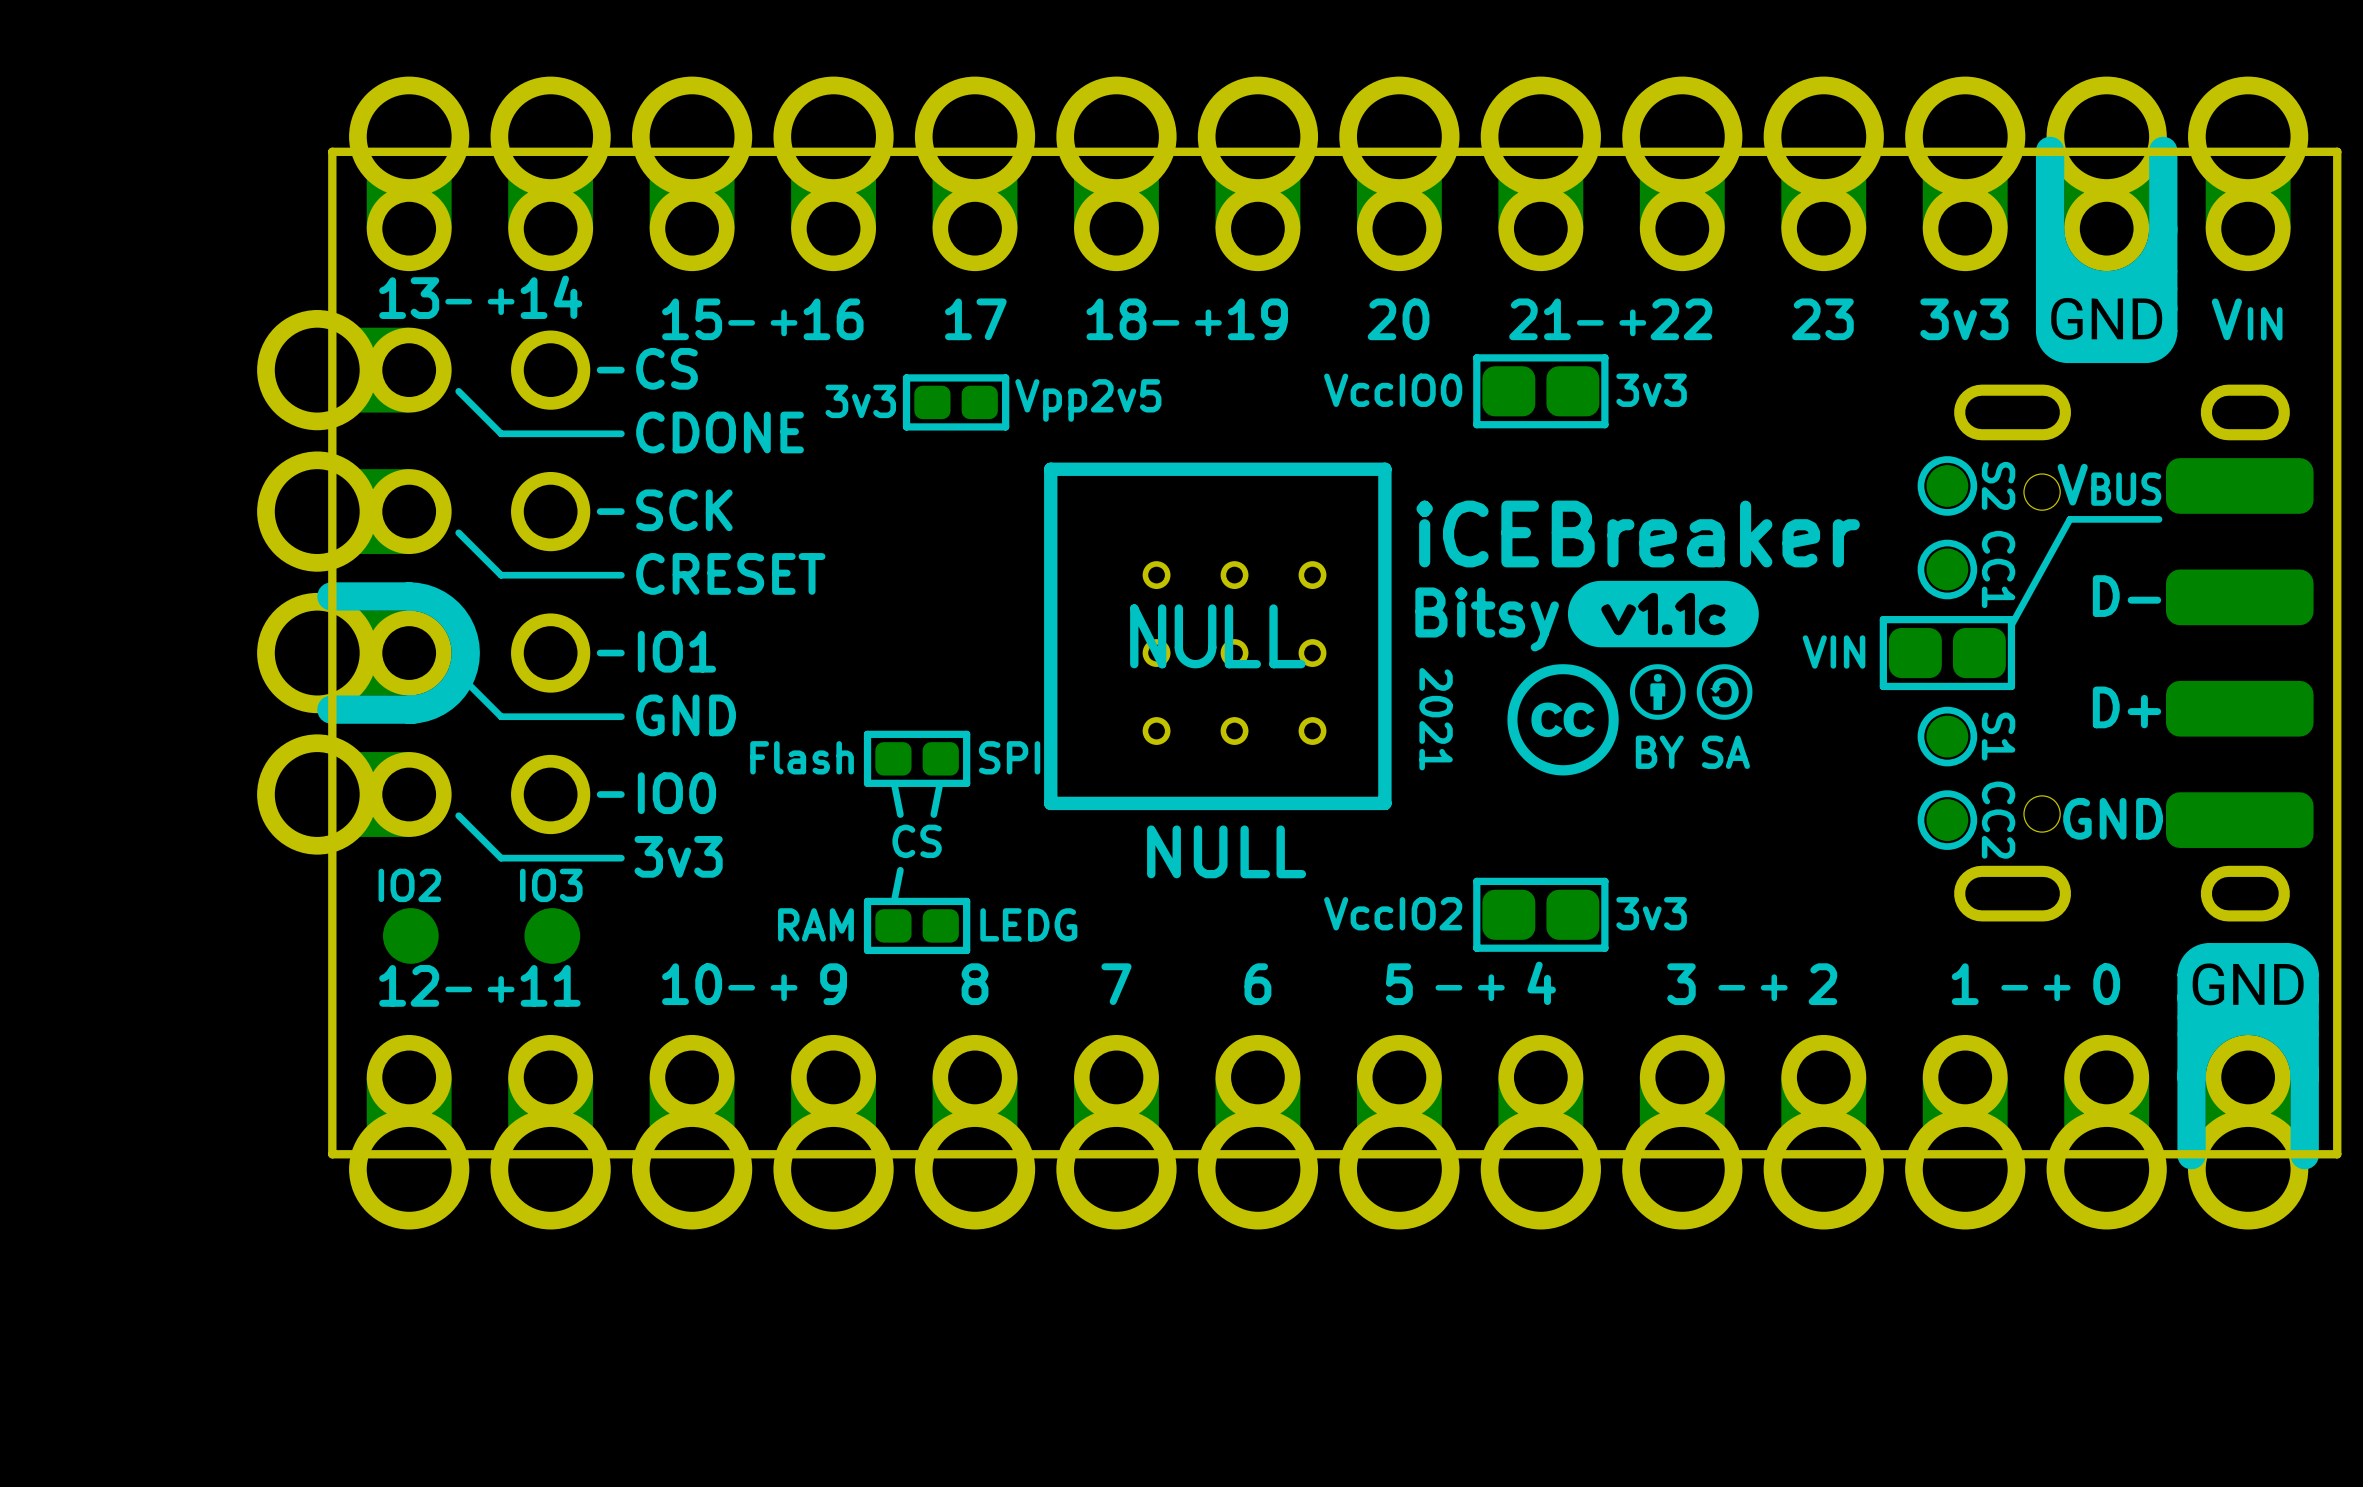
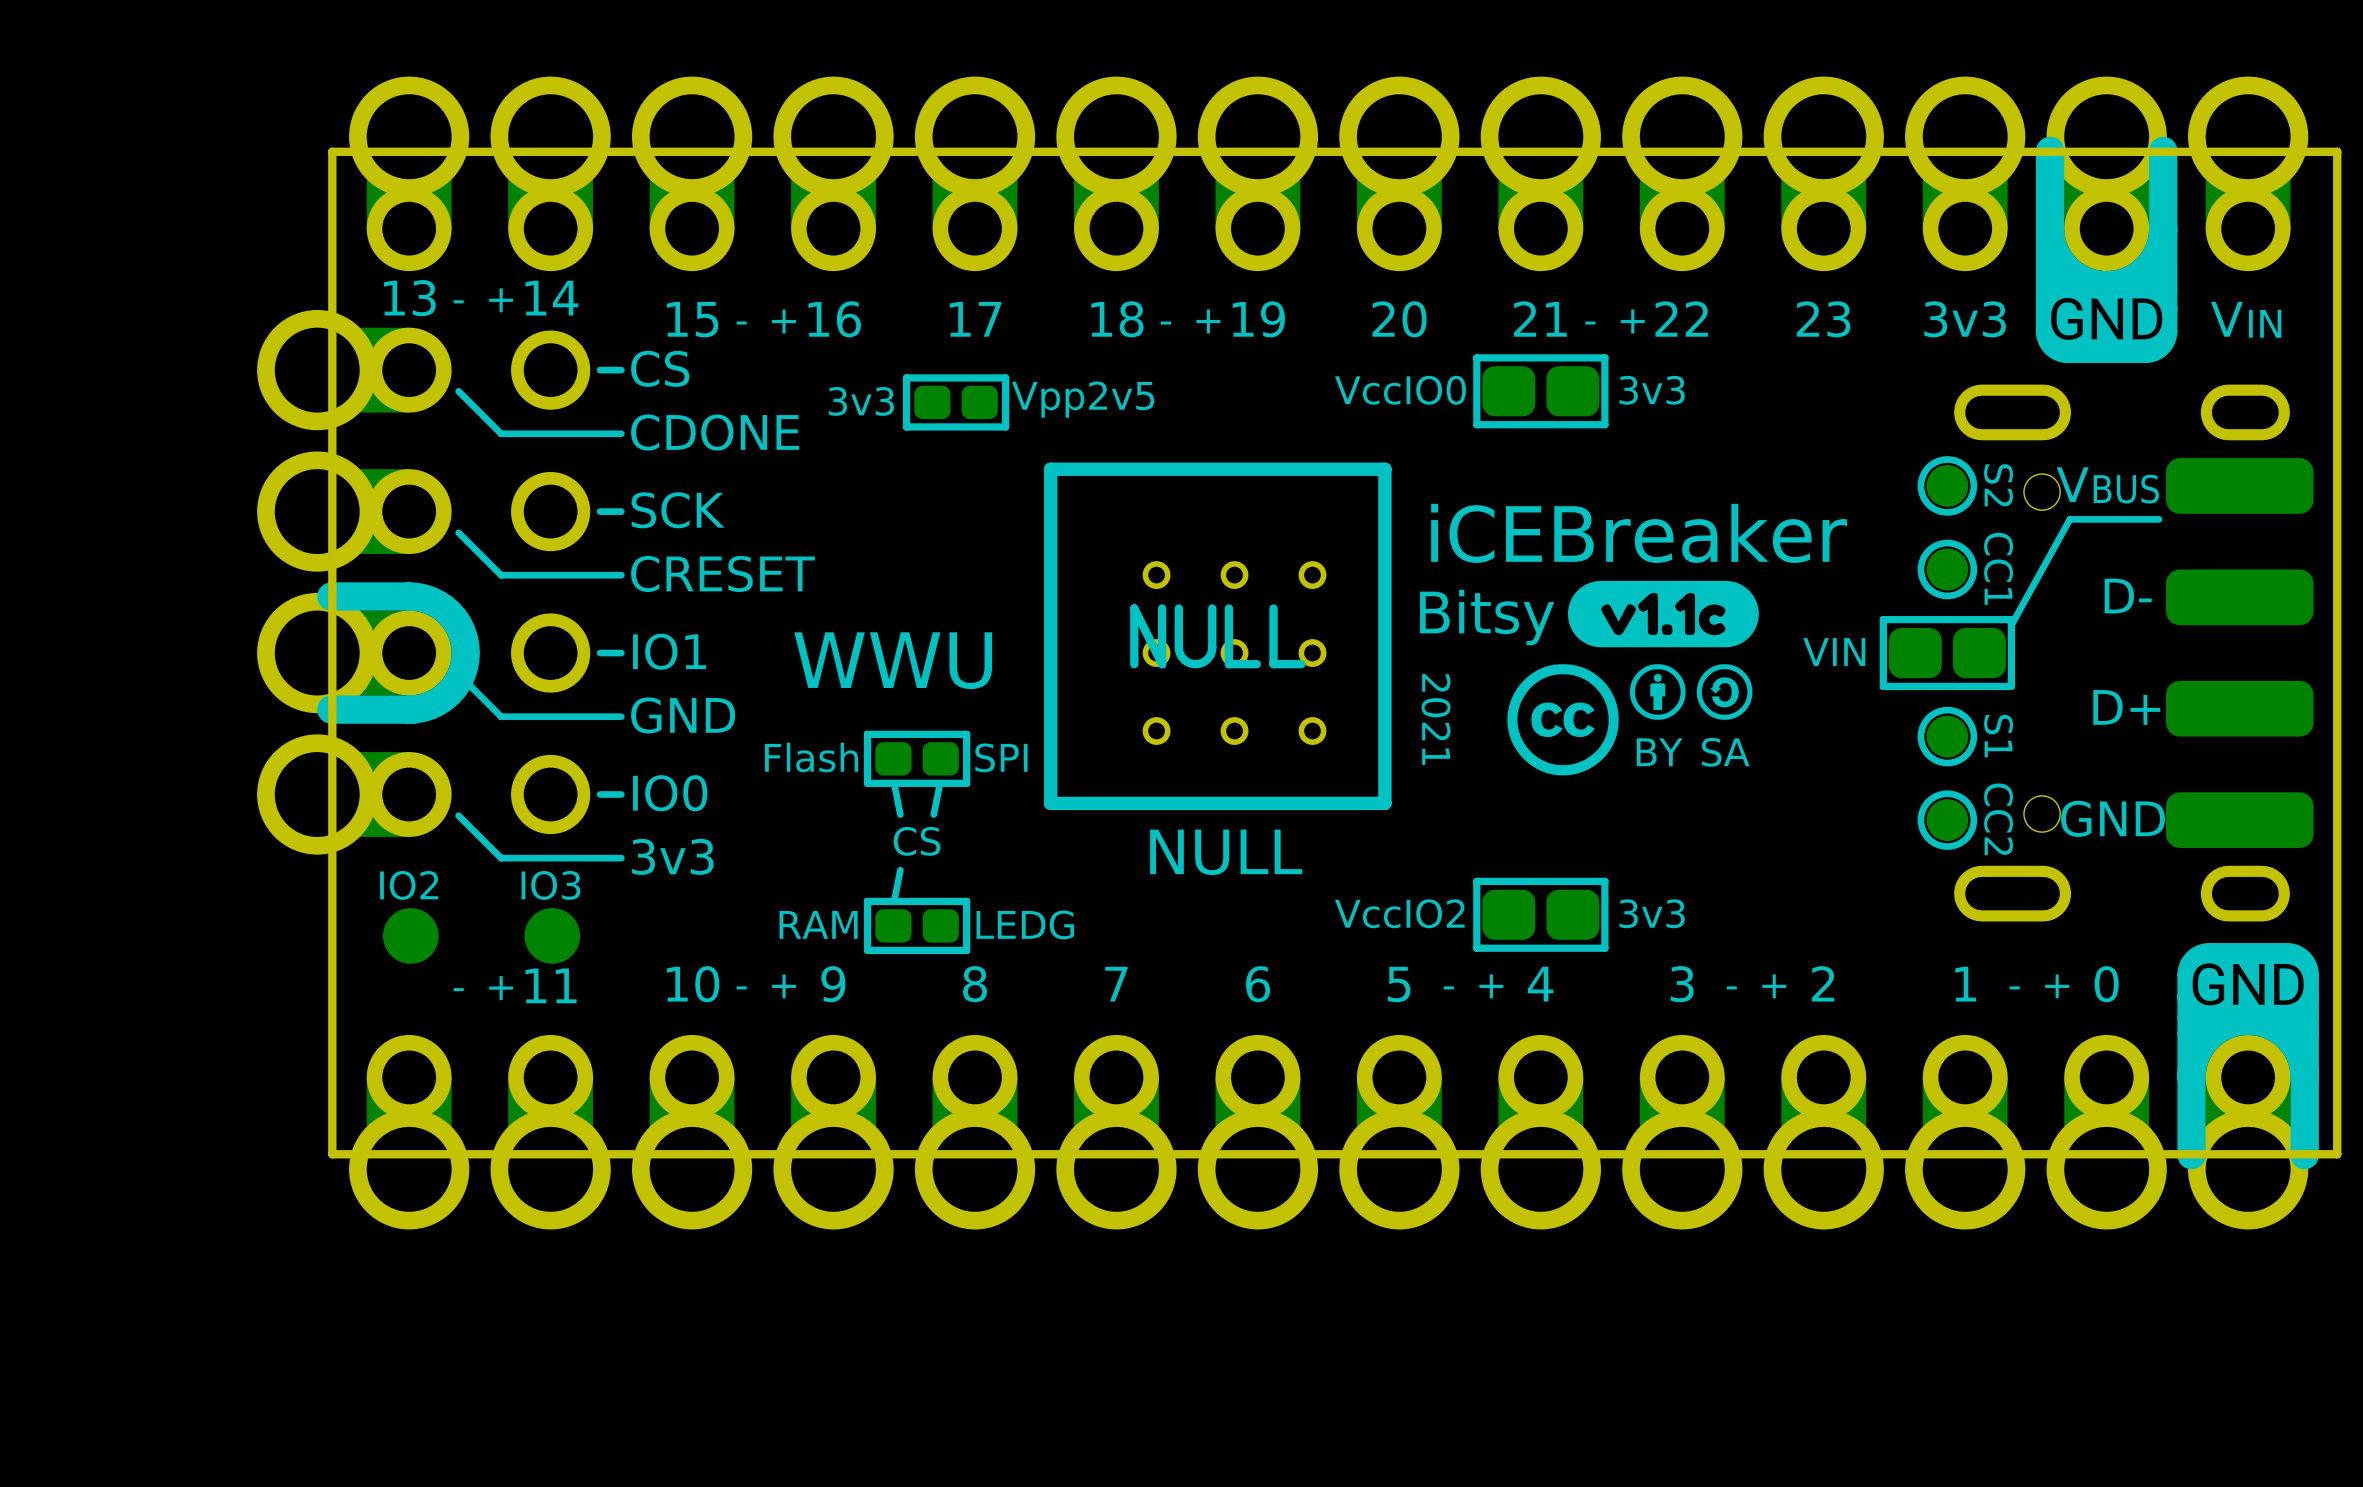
text: none -> WWU (893, 660)
text: 12 (409, 985) -> none

